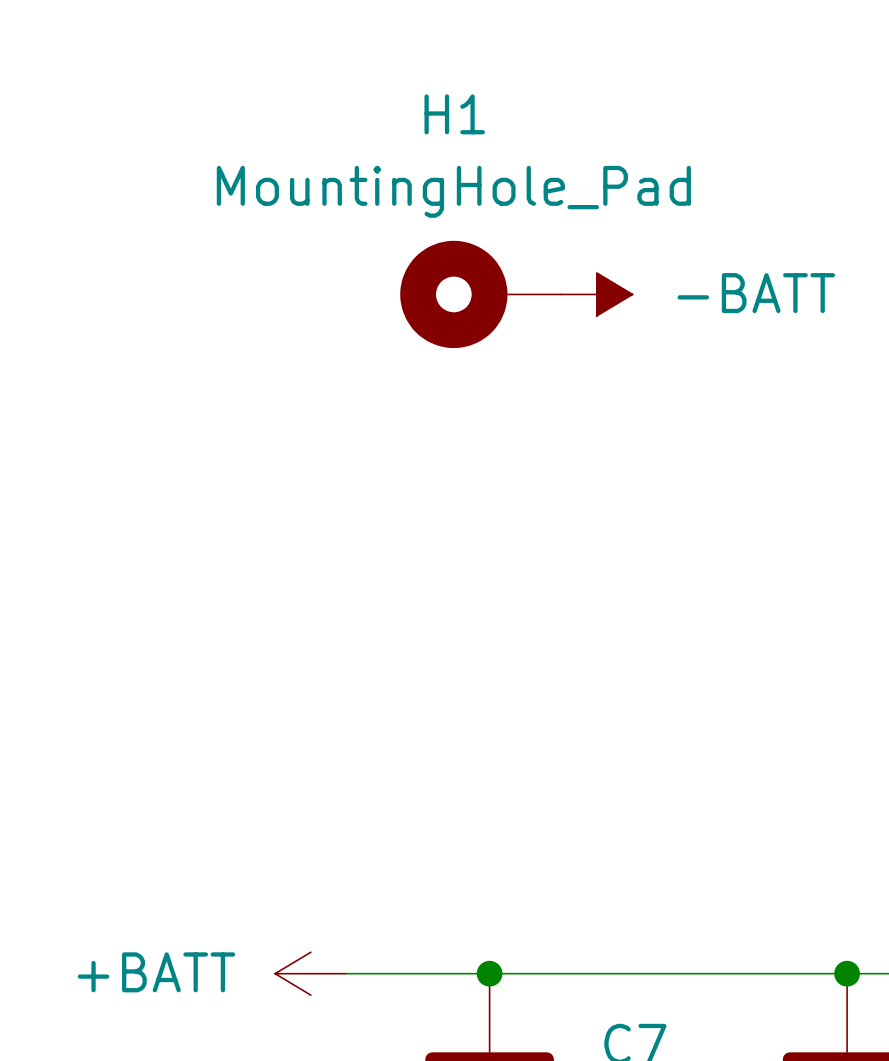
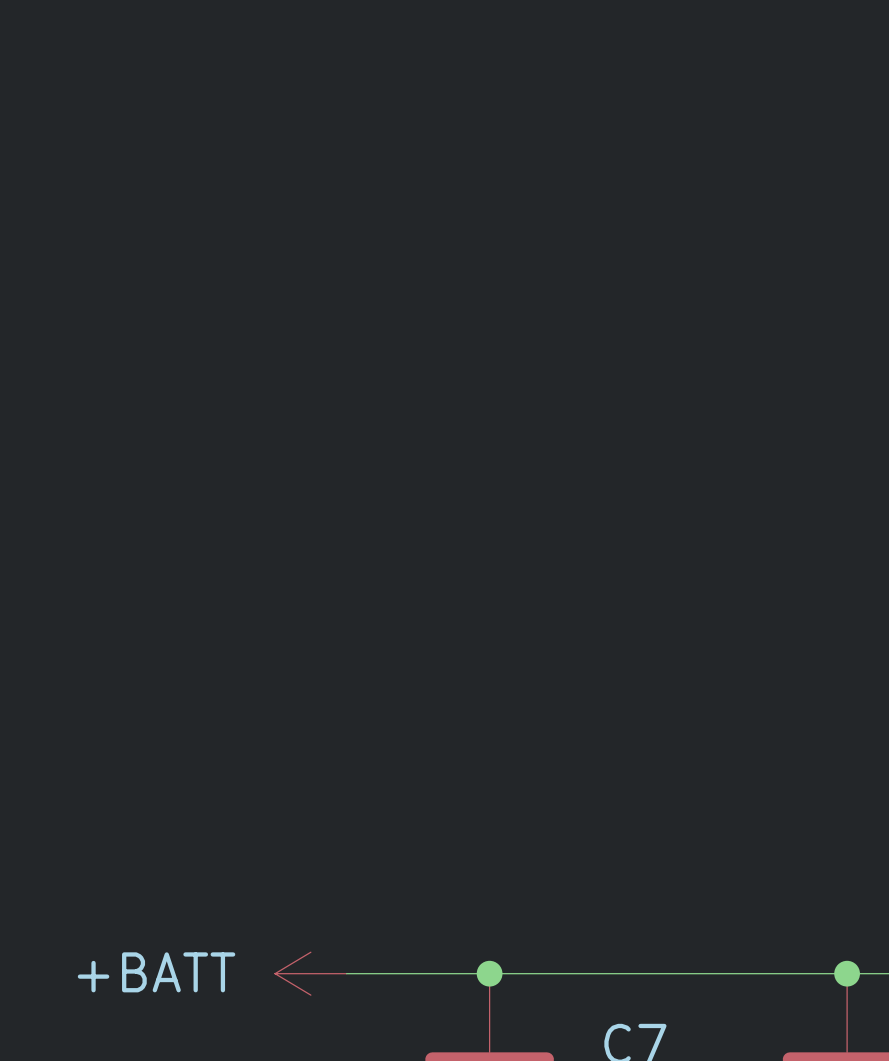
H1: MountingHole_Pad (480, 294) -> none
power symbol: -BATT (596, 294) -> none

